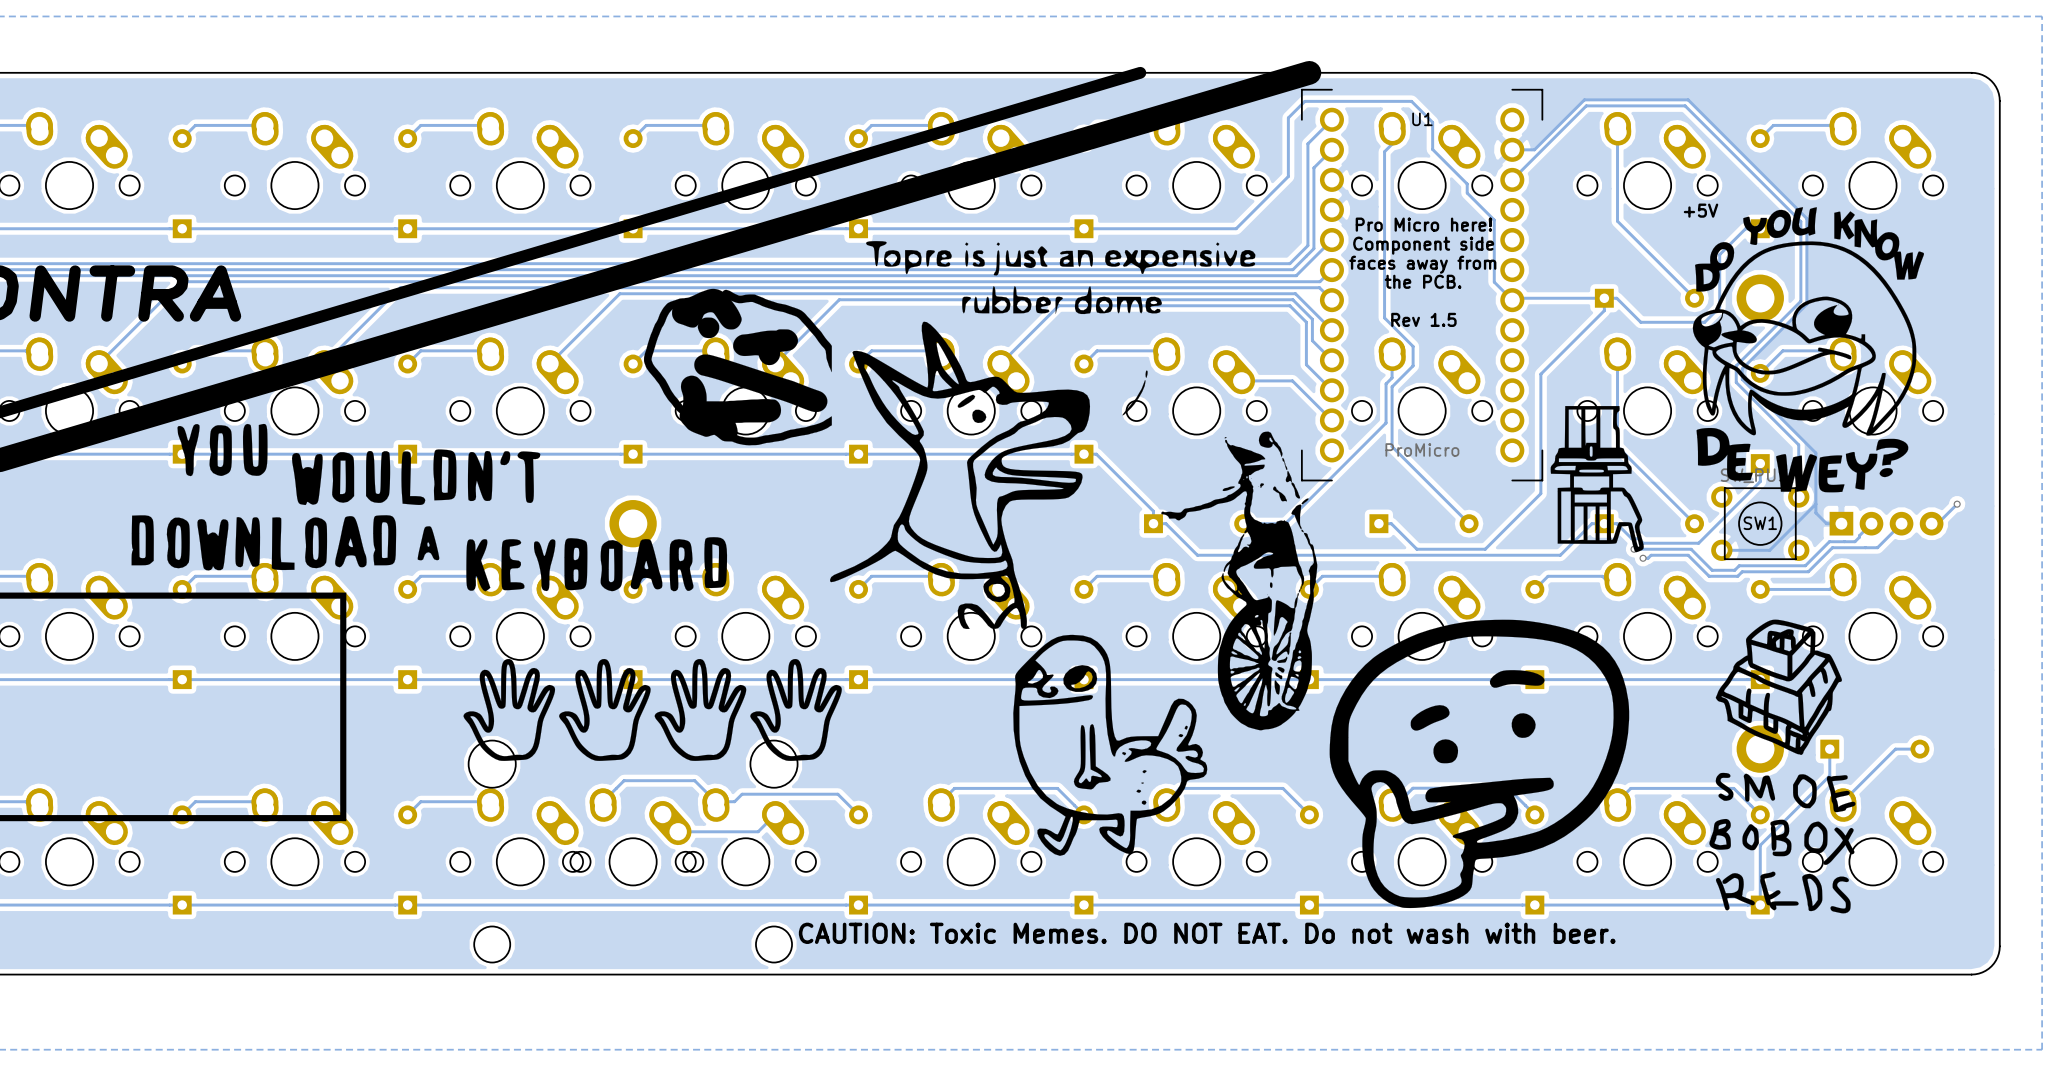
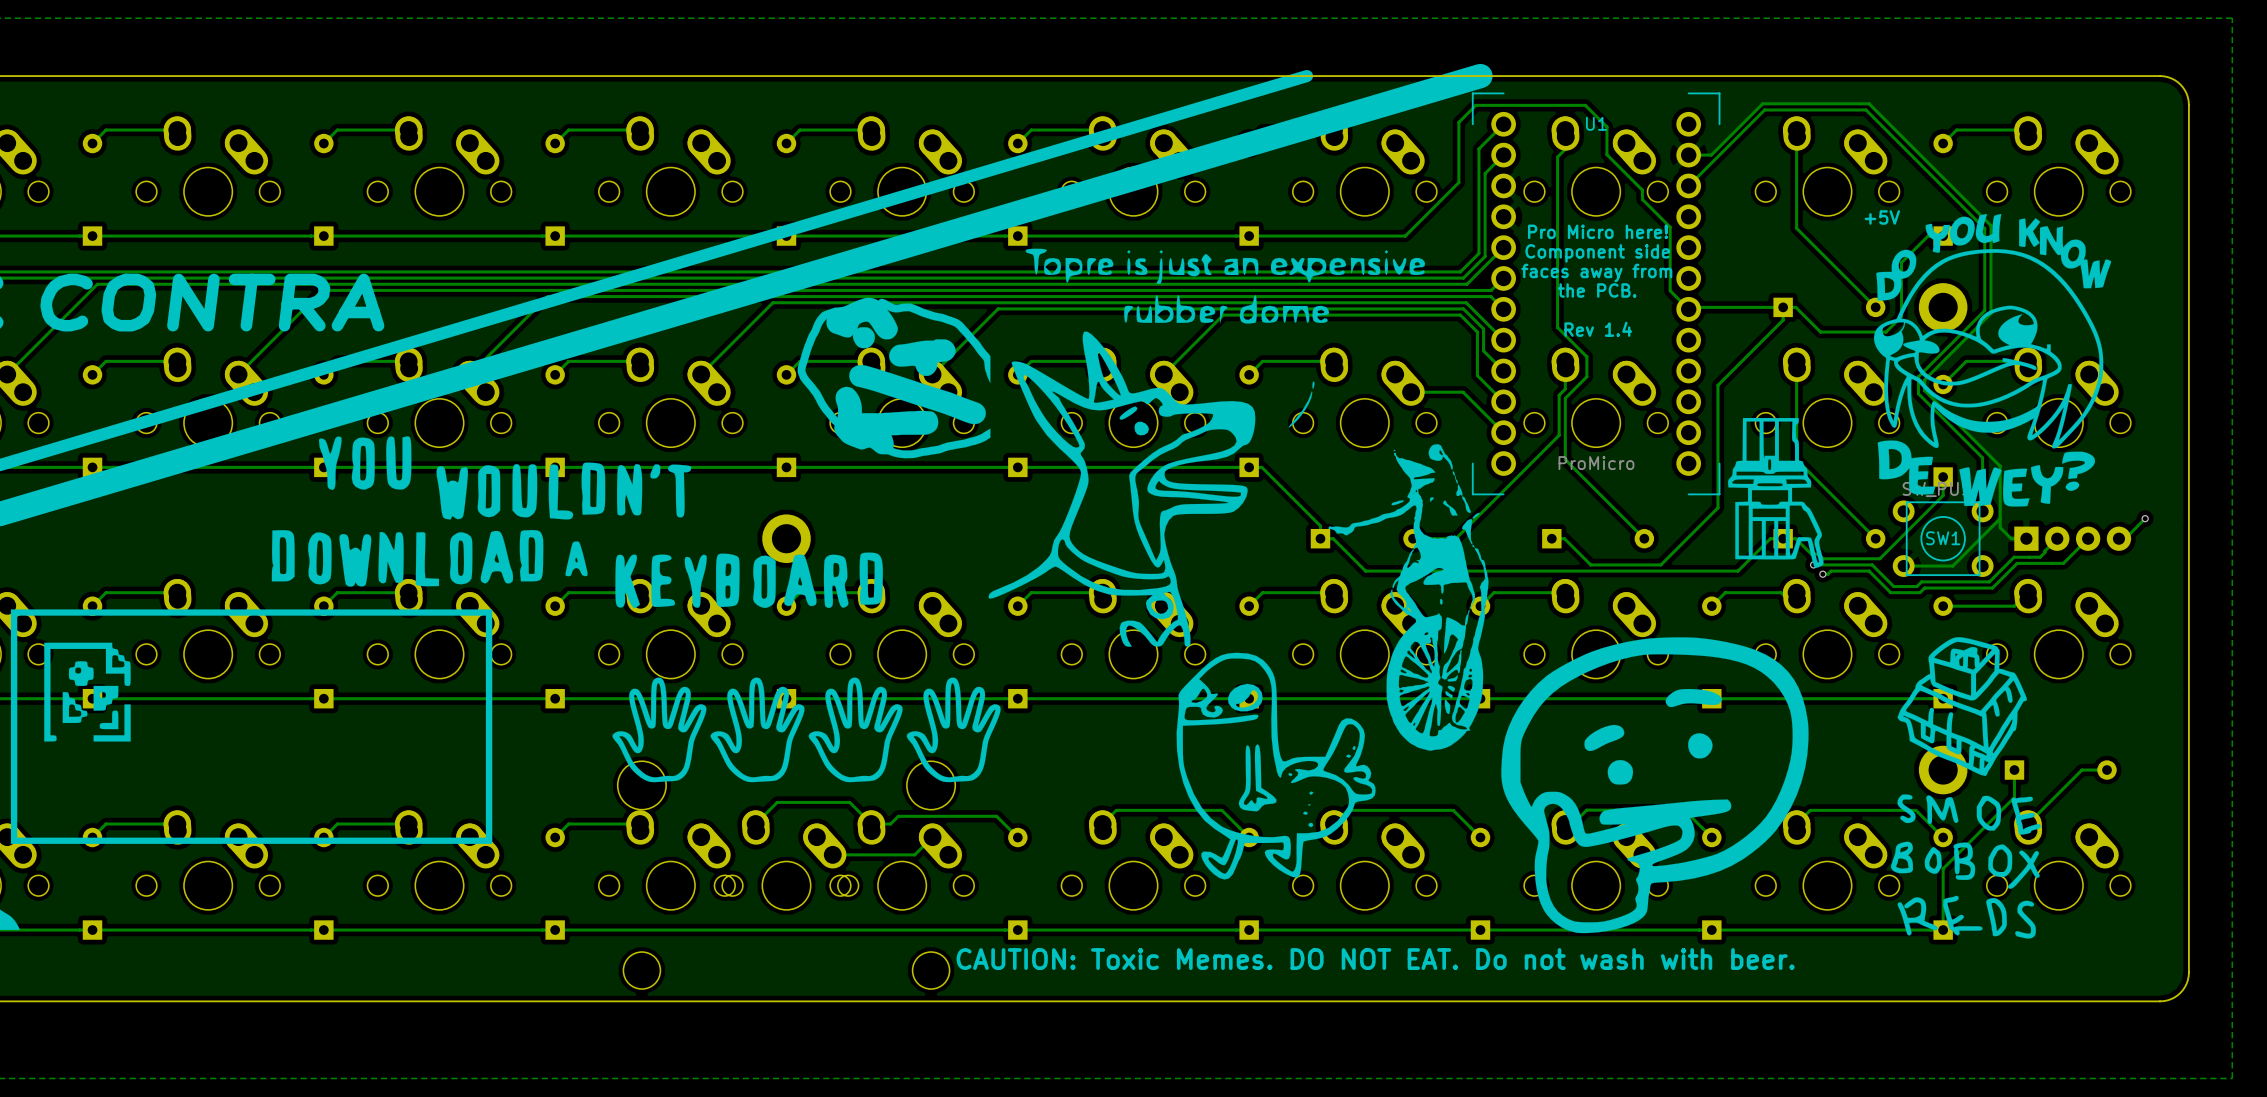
text: Rev 1.5 (1423, 319) -> Rev 1.4 (1598, 329)

